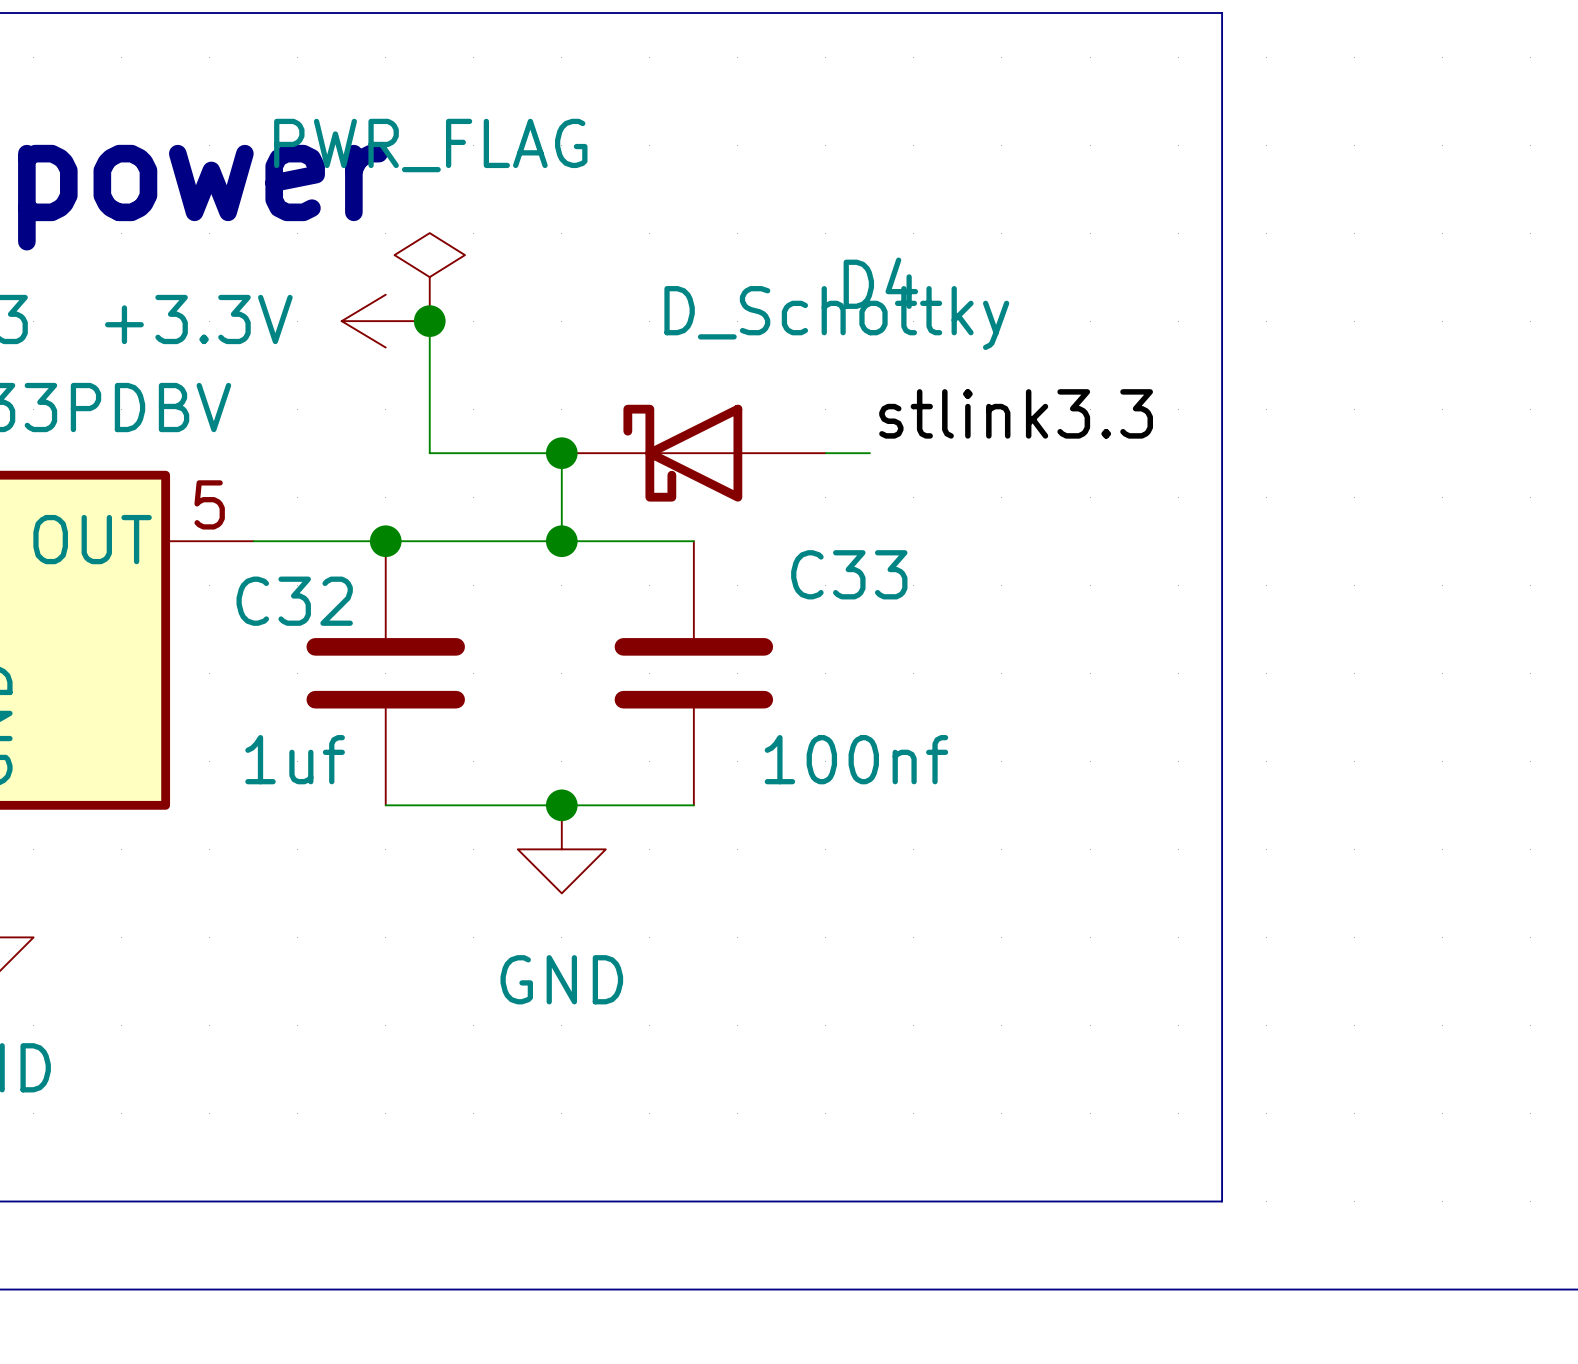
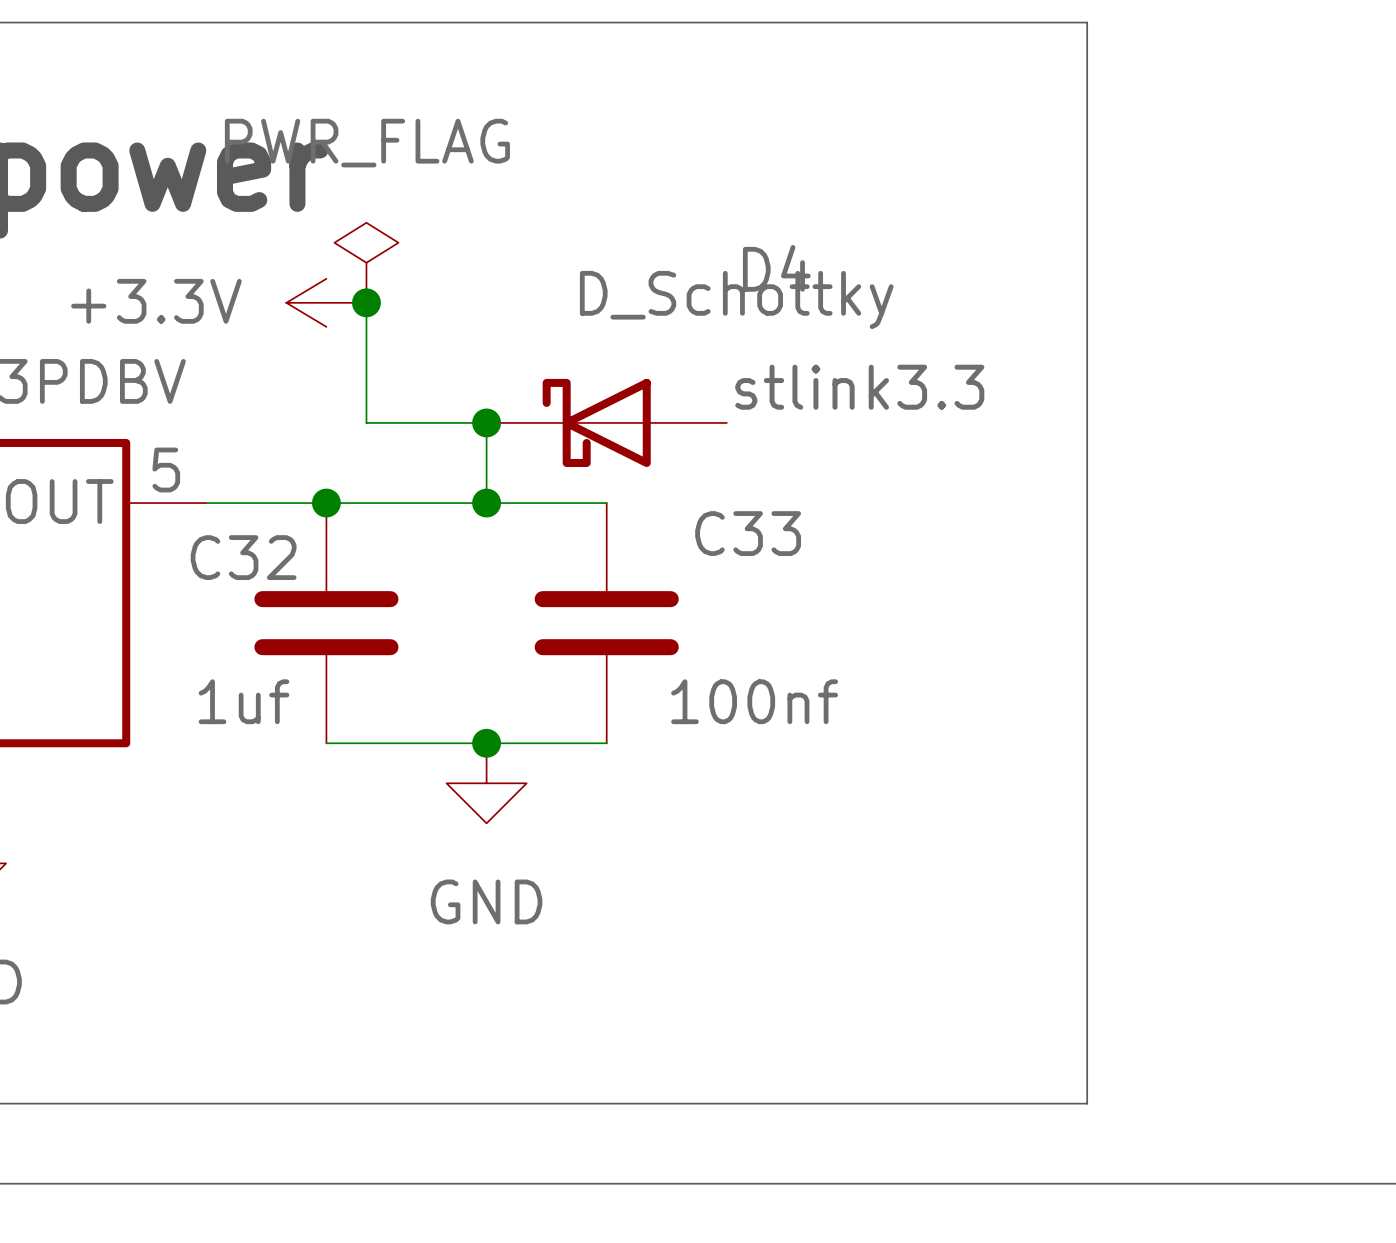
label position: stlink3.3 (1016, 413) -> stlink3.3 (859, 387)
wire: (825, 453) (869, 453) -> none

